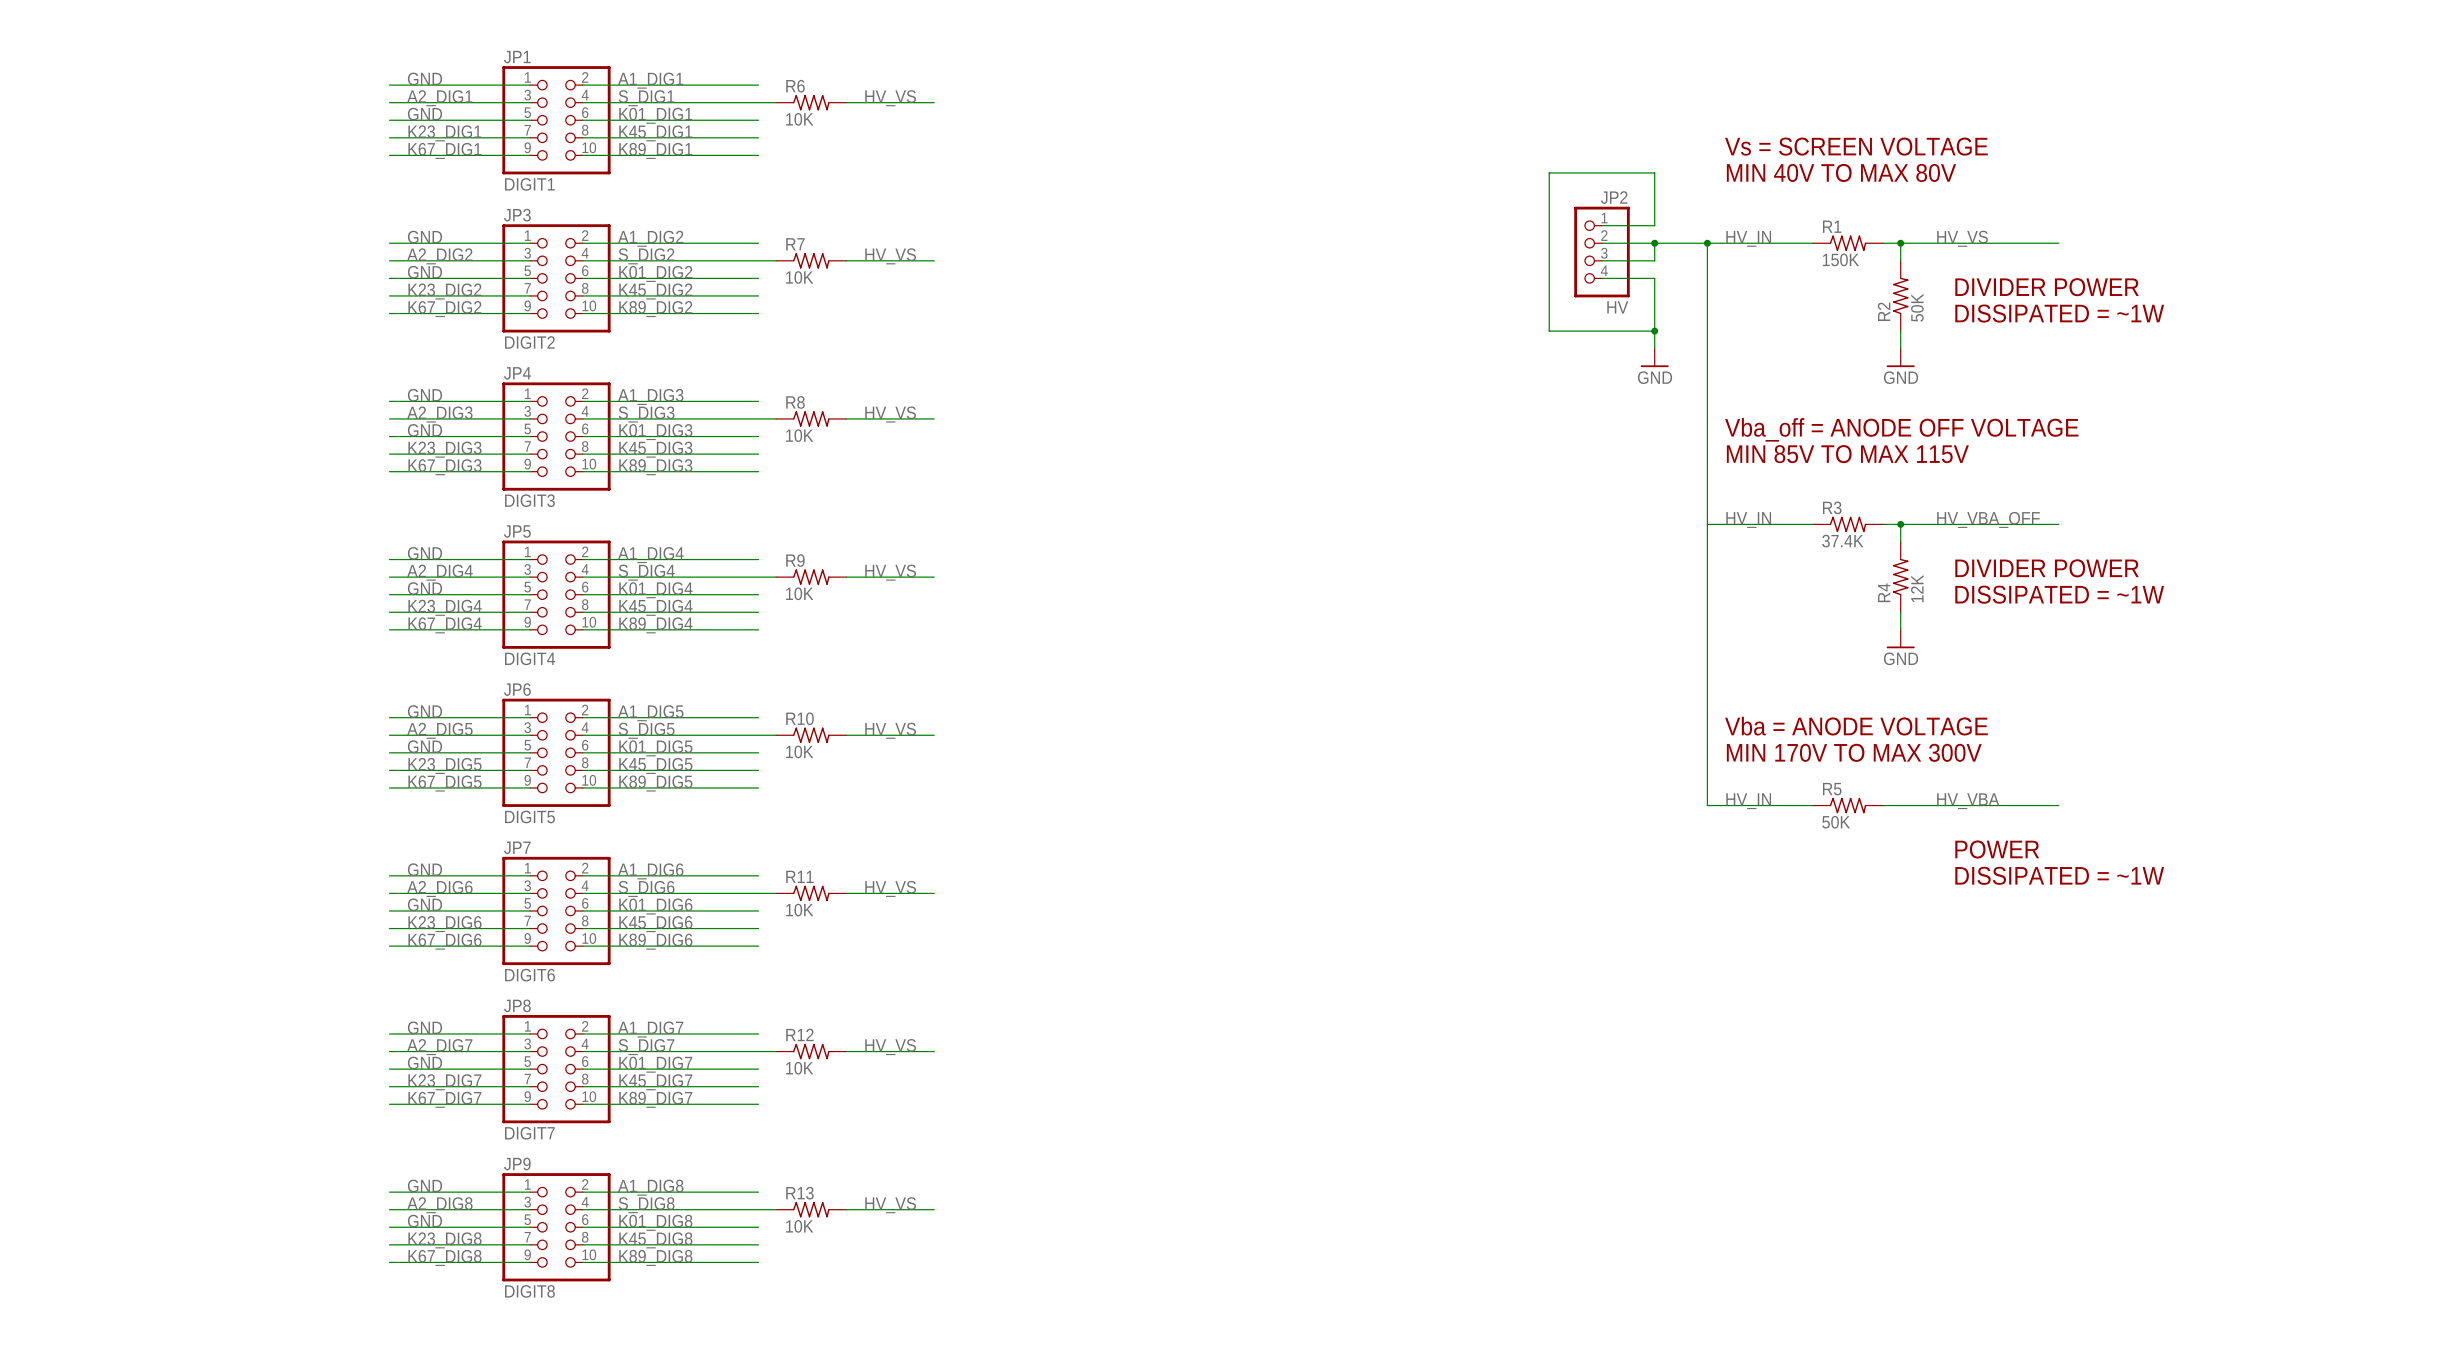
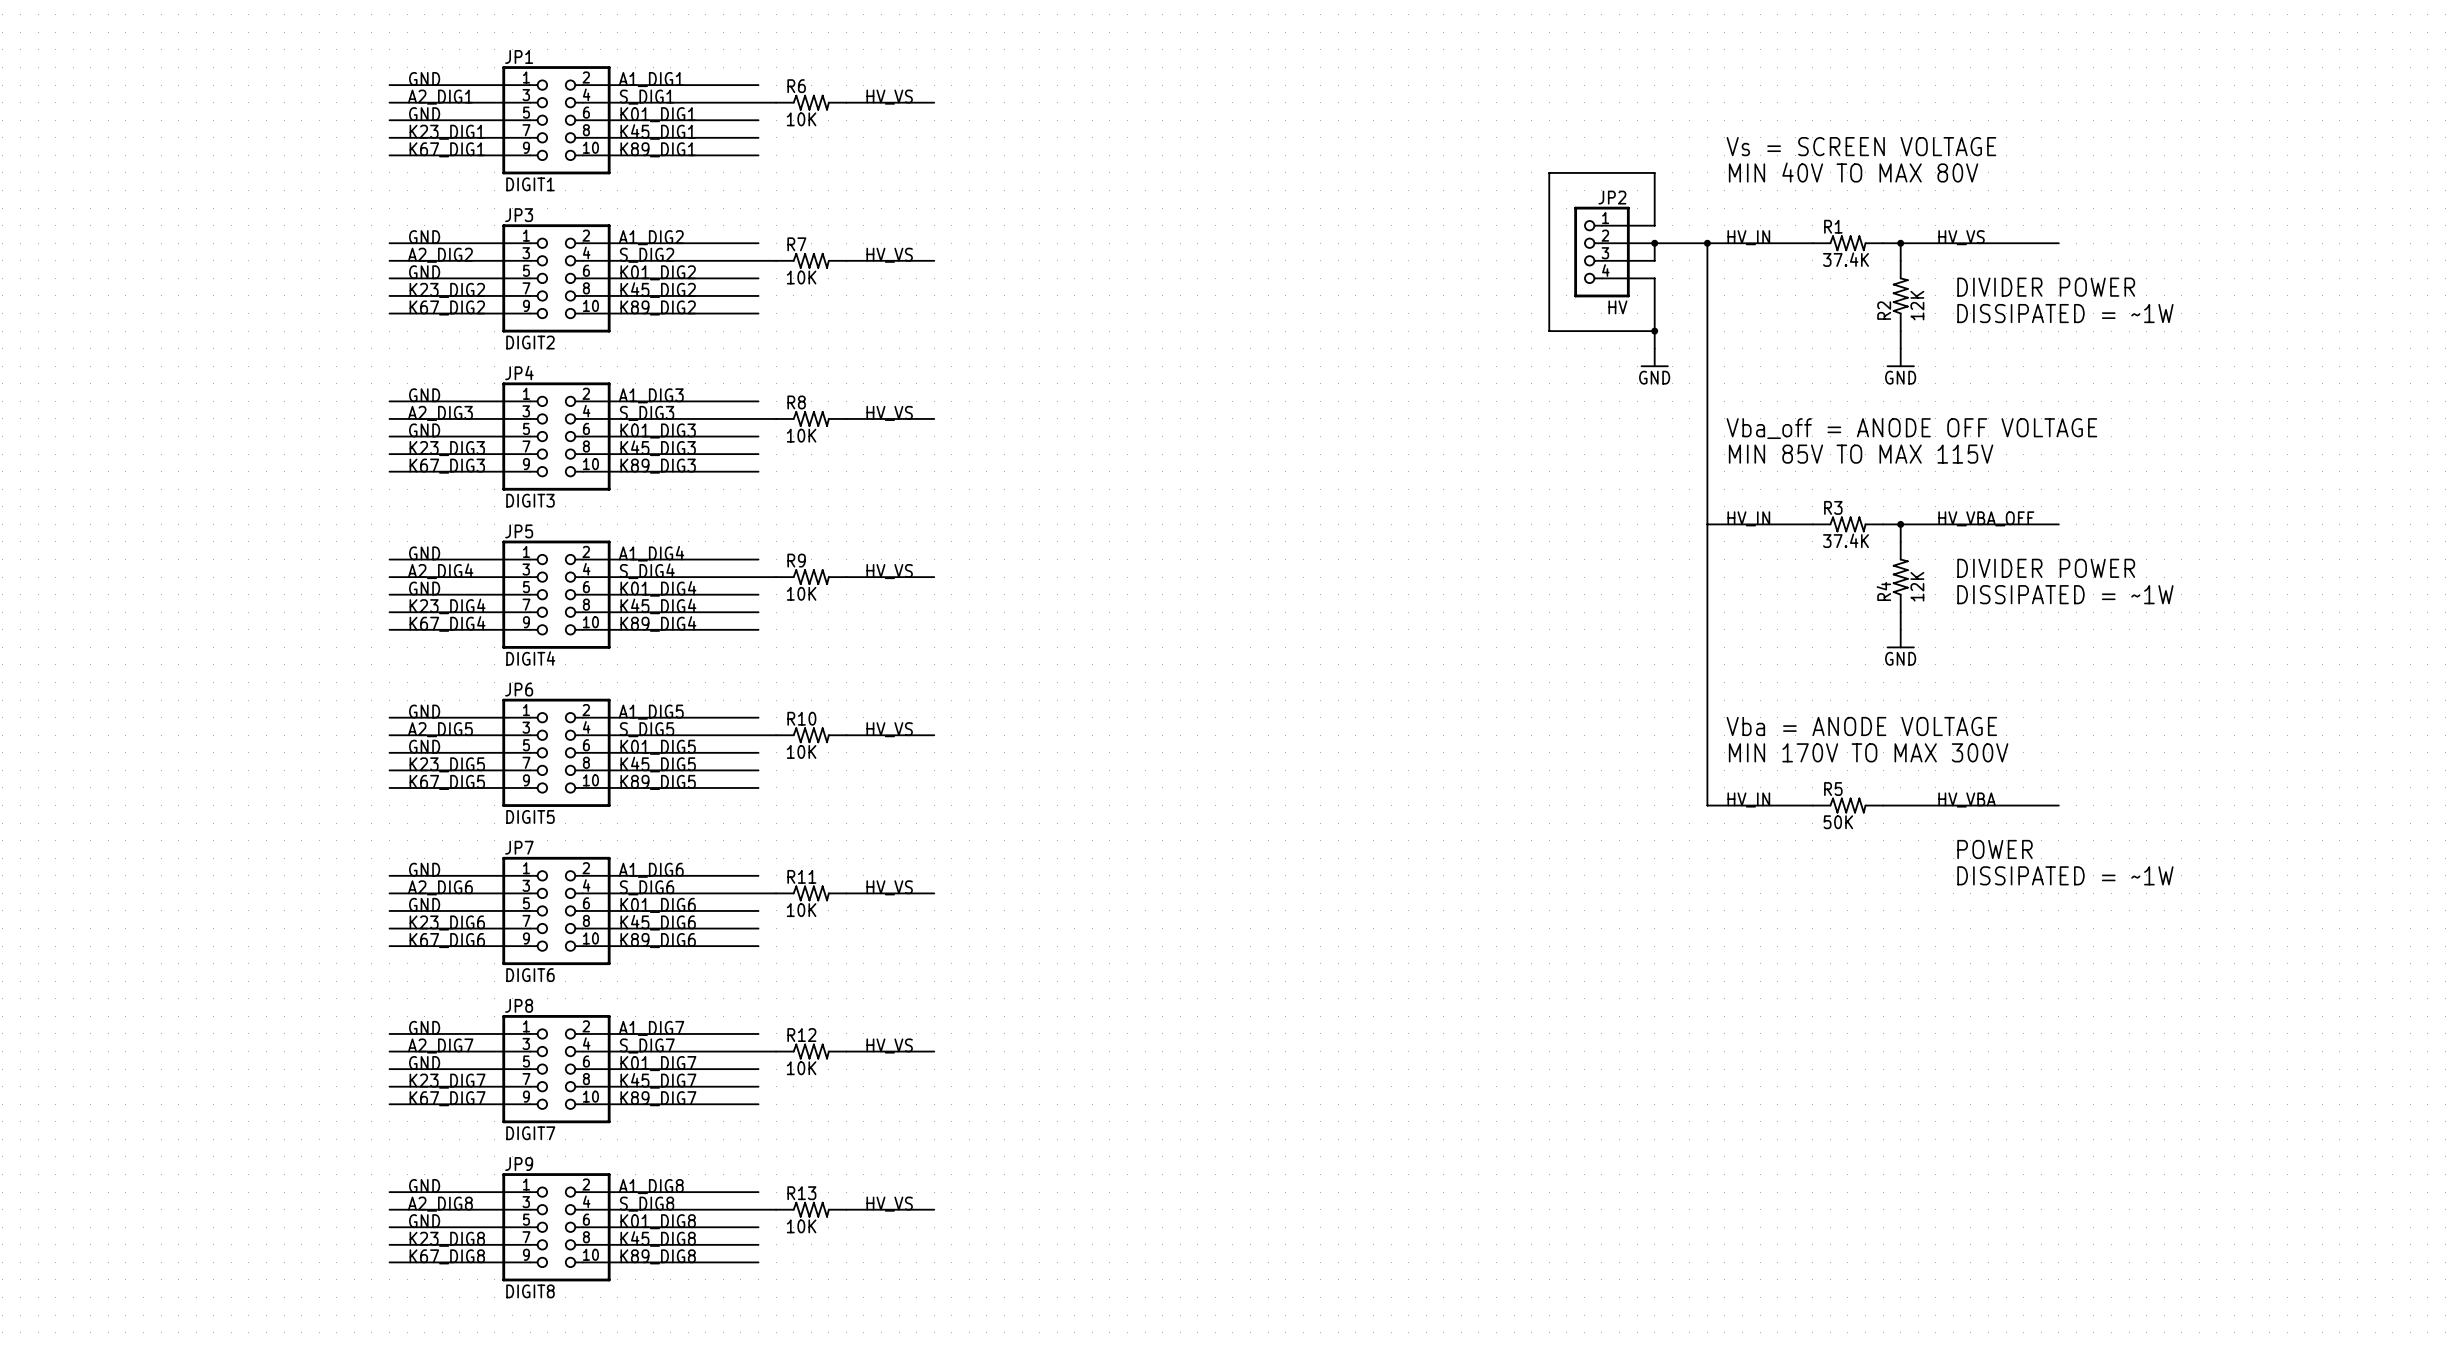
R1 value: 150K (1840, 259) -> 37.4K (1845, 259)
R2 value: 50K (1917, 307) -> 12K (1917, 305)

